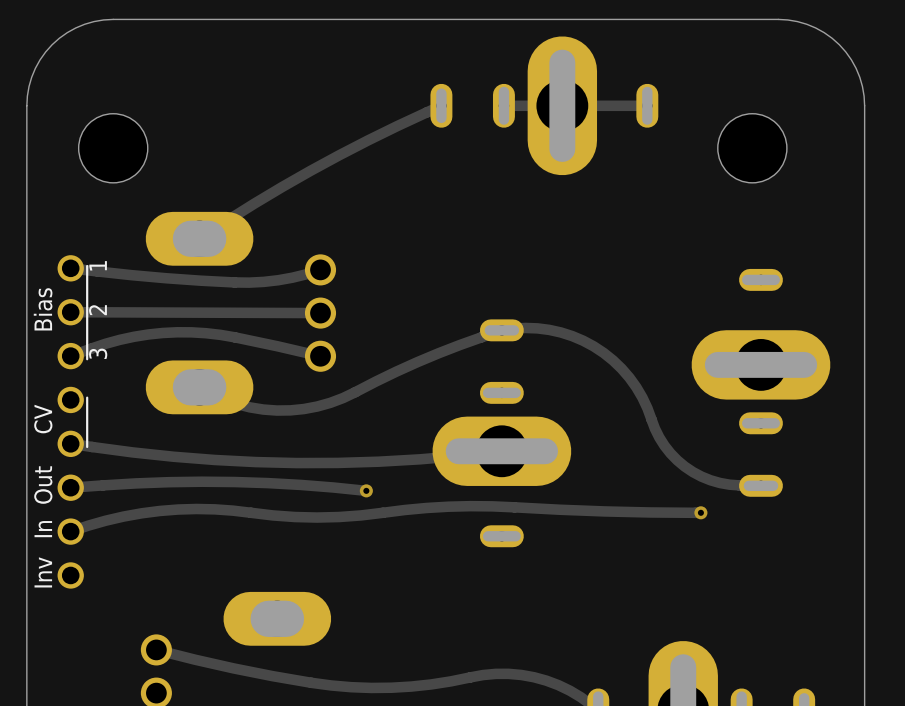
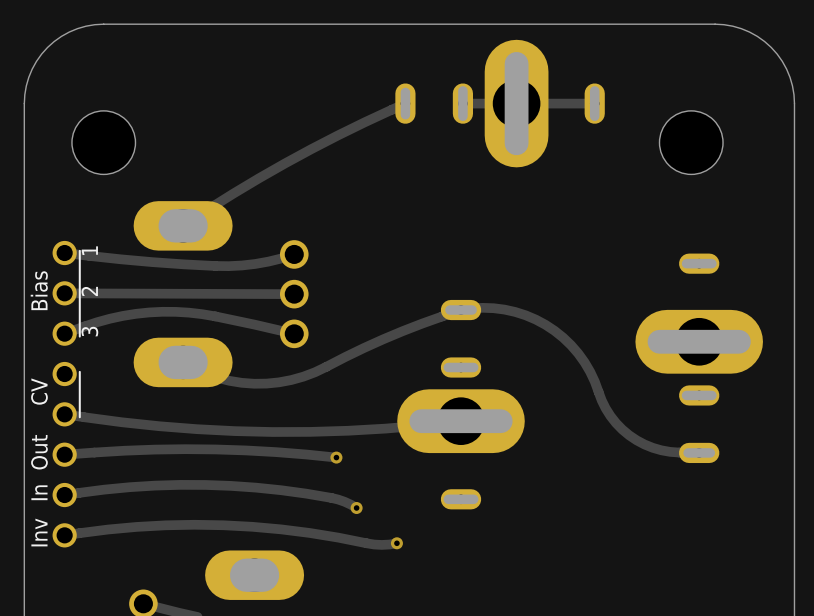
track: (700, 512) (470, 506) (317, 517) (214, 509) (178, 509) (123, 516) (70, 531) -> (356, 508) (331, 497) (281, 490) (230, 485) (154, 485) (64, 495)
via: (700, 512) -> none
via: none -> (356, 508)
track: none -> (64, 535) (136, 526) (223, 525) (309, 532) (374, 544) (396, 543)
via: none -> (396, 543)

